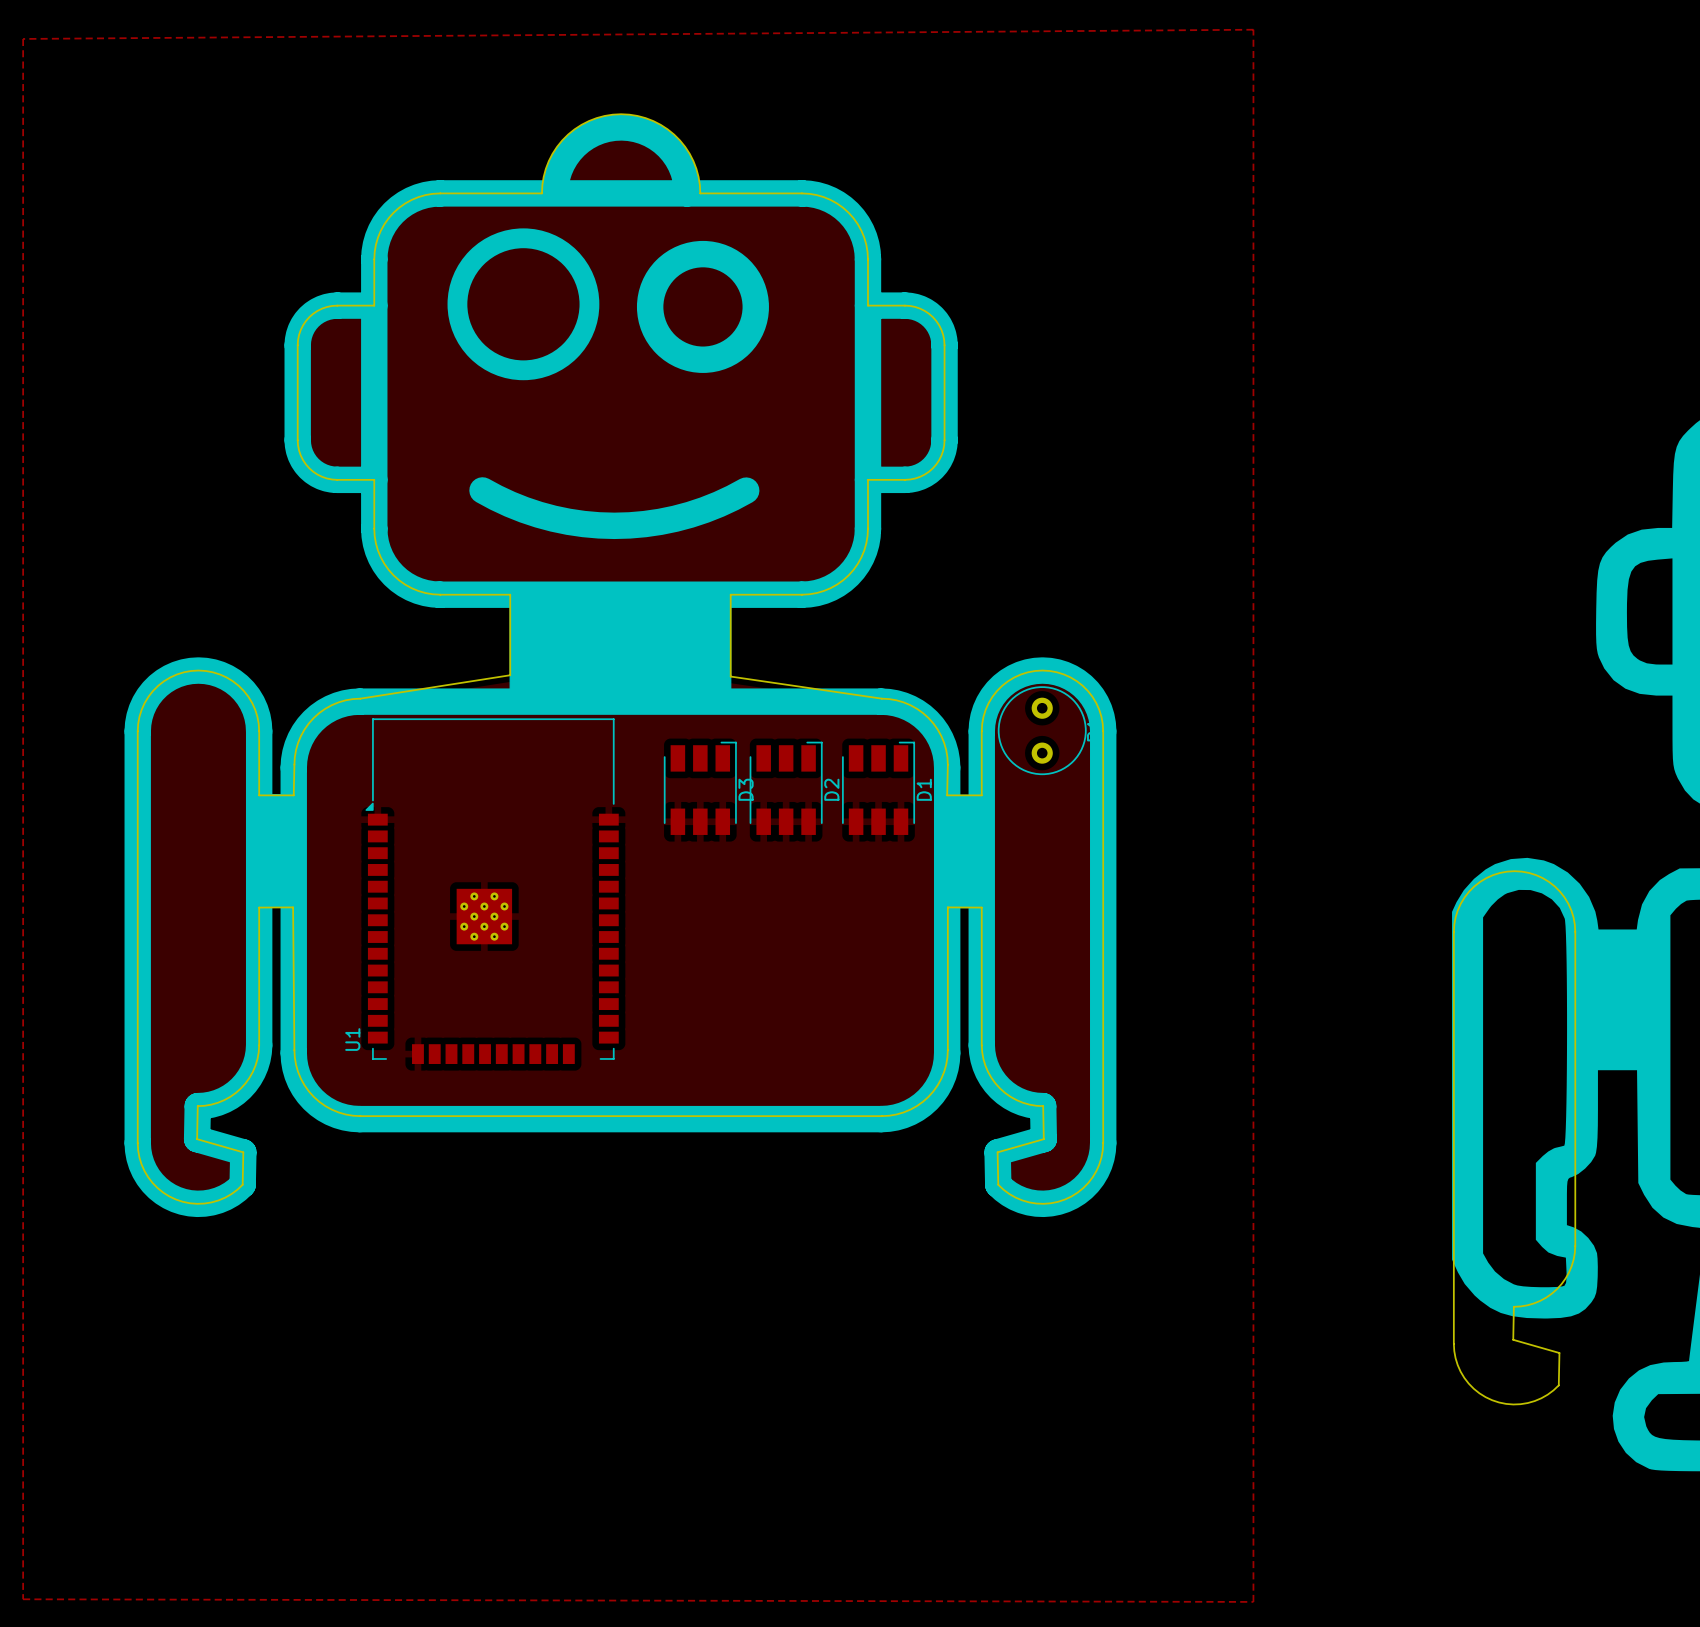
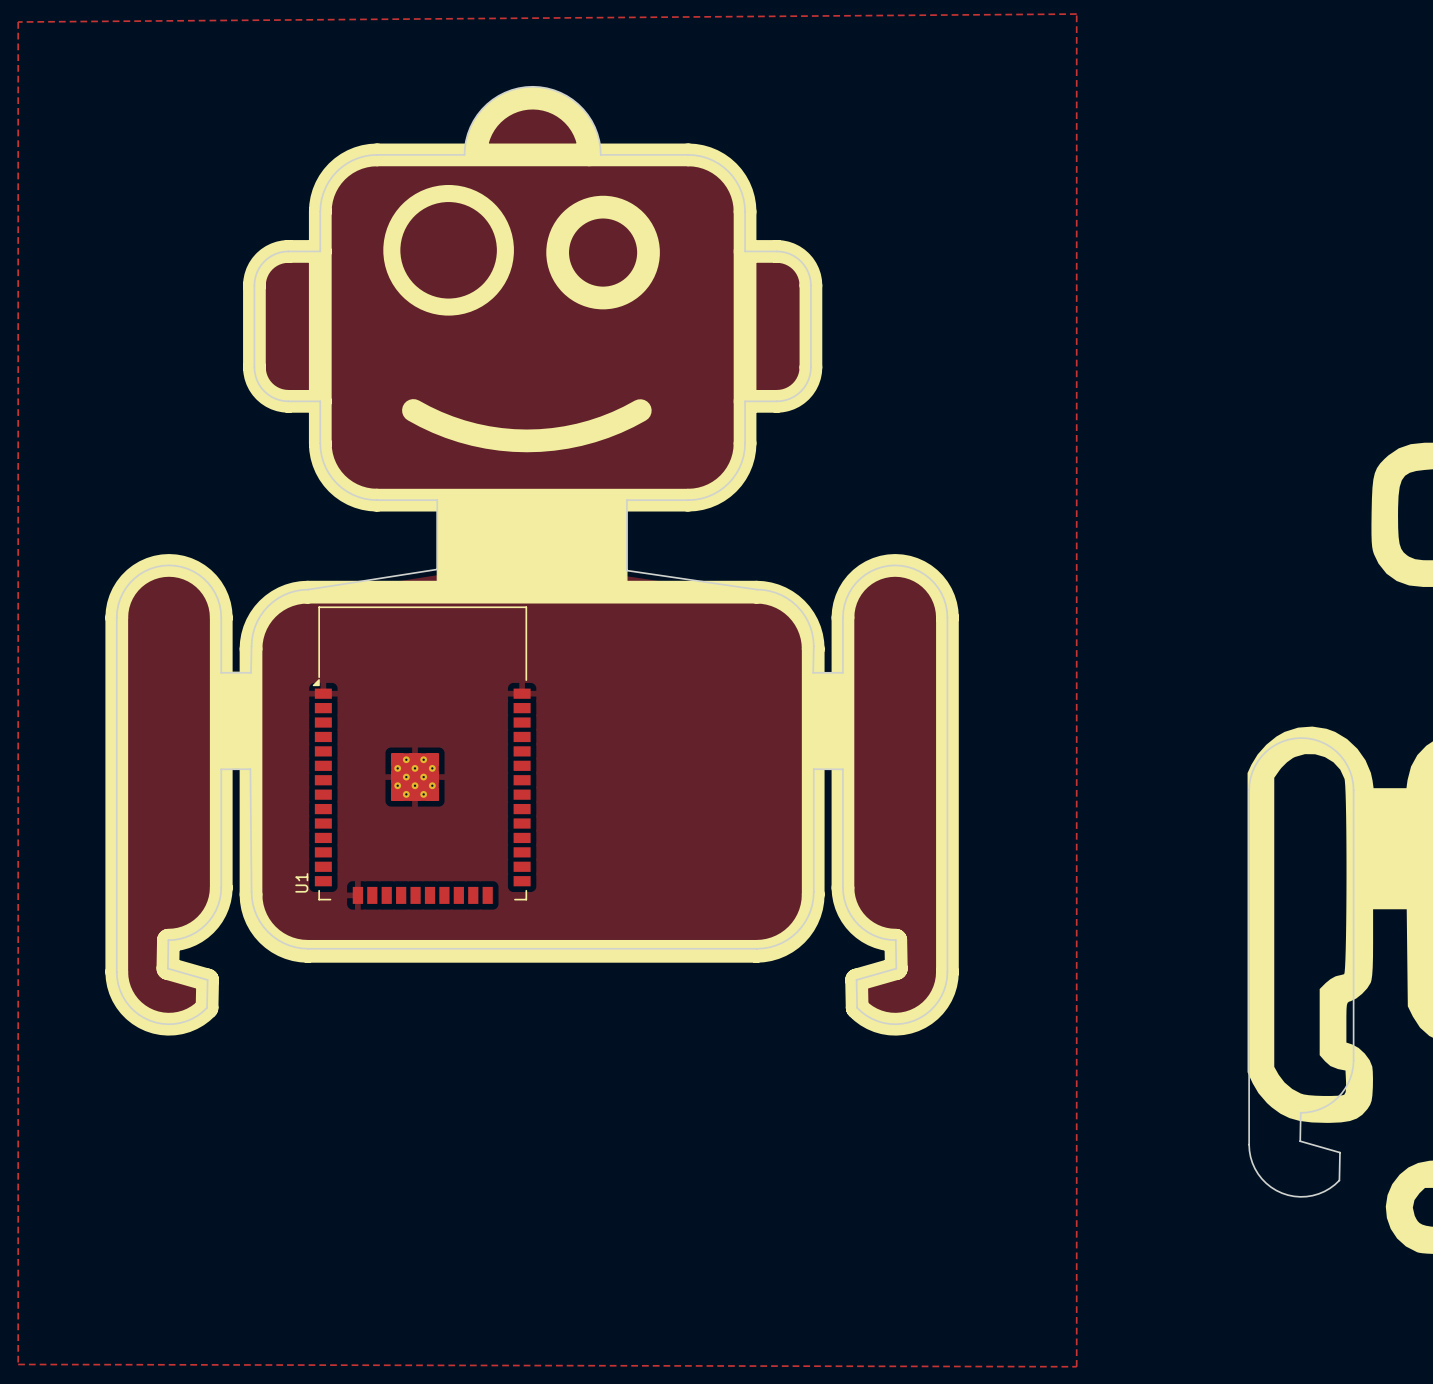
part: (1042, 730) -> none
D3: (700, 788) -> none
D2: (786, 788) -> none
D1: (878, 788) -> none

